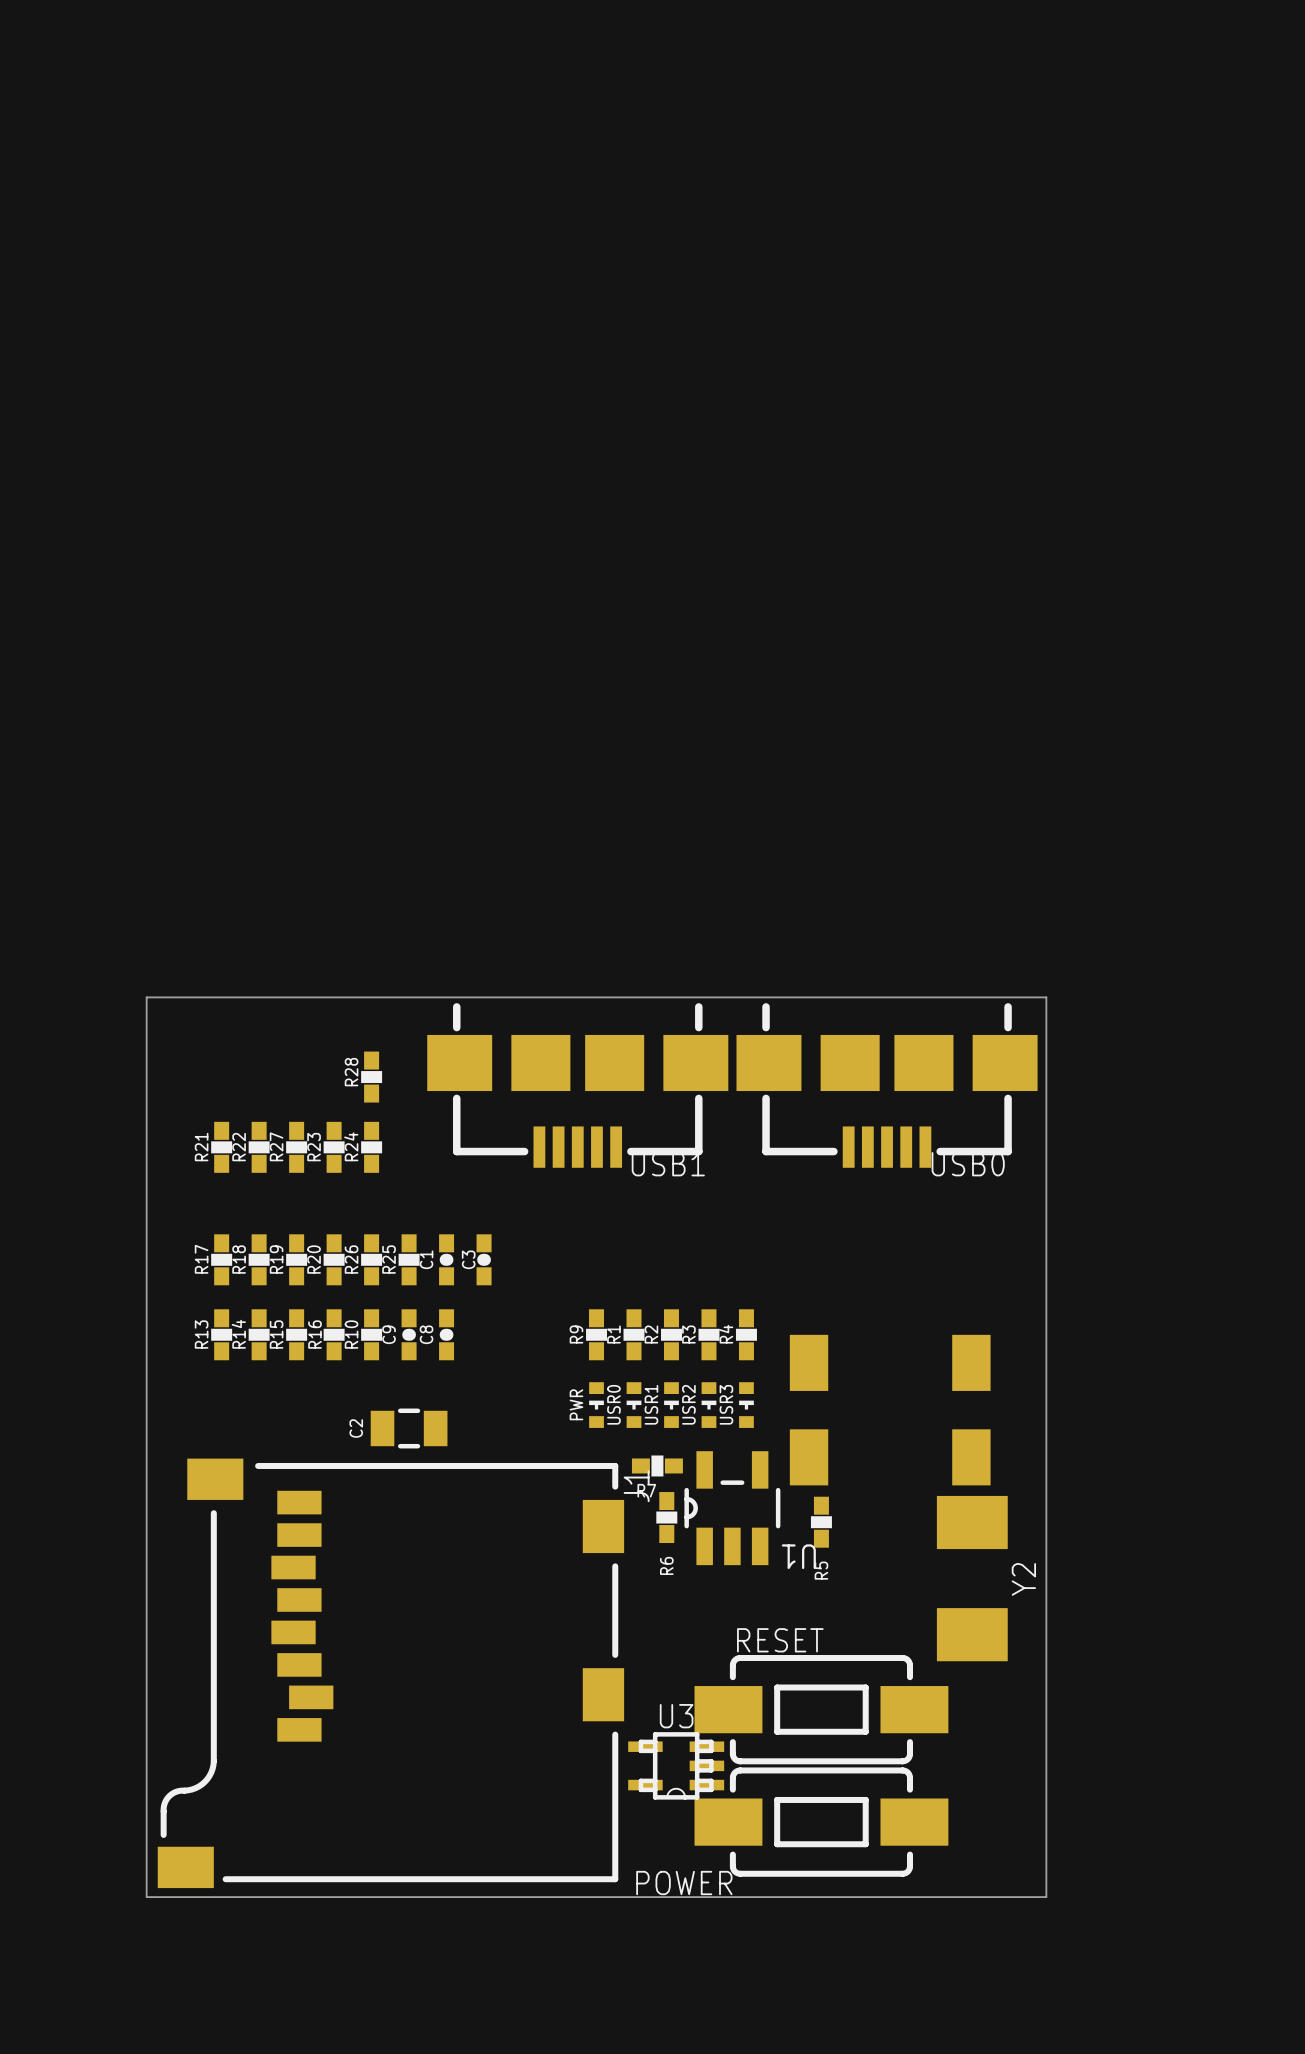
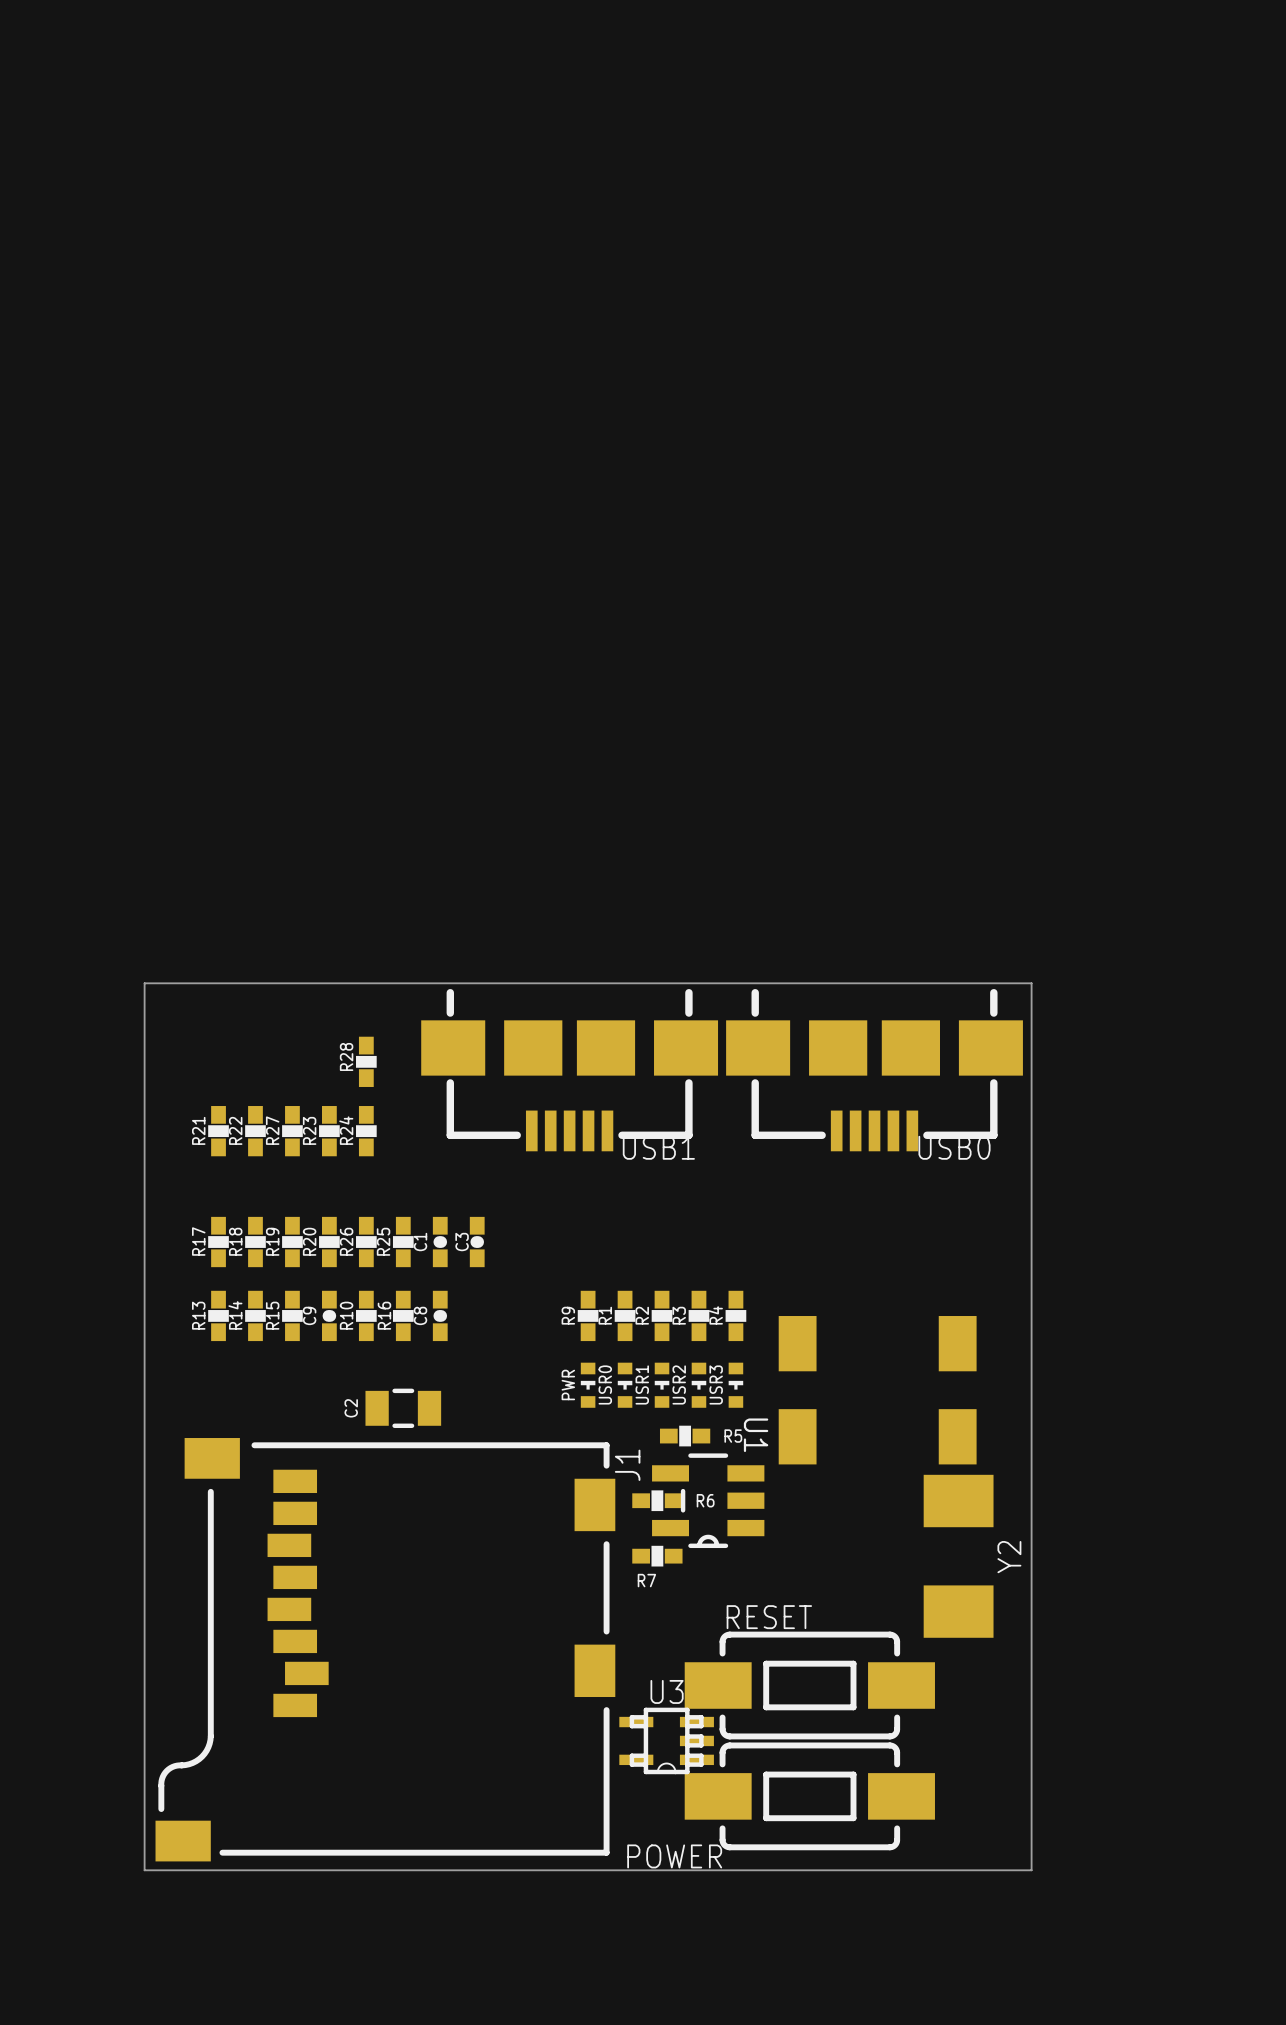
R16 position: (334, 1334) -> (403, 1315)
C9 position: (409, 1334) -> (329, 1315)
R7 position: (657, 1465) -> (657, 1556)
U1 rotation: 0° (732, 1508) -> 90° counterclockwise (708, 1500)
R6 rotation: 0° (666, 1517) -> 90° clockwise (657, 1500)
R5 rotation: 0° (821, 1522) -> 90° clockwise (685, 1436)
R5 position: (821, 1522) -> (685, 1436)
R6 name position: R6 (666, 1565) -> R6 (705, 1500)
R5 name position: R5 (821, 1570) -> R5 (733, 1436)

